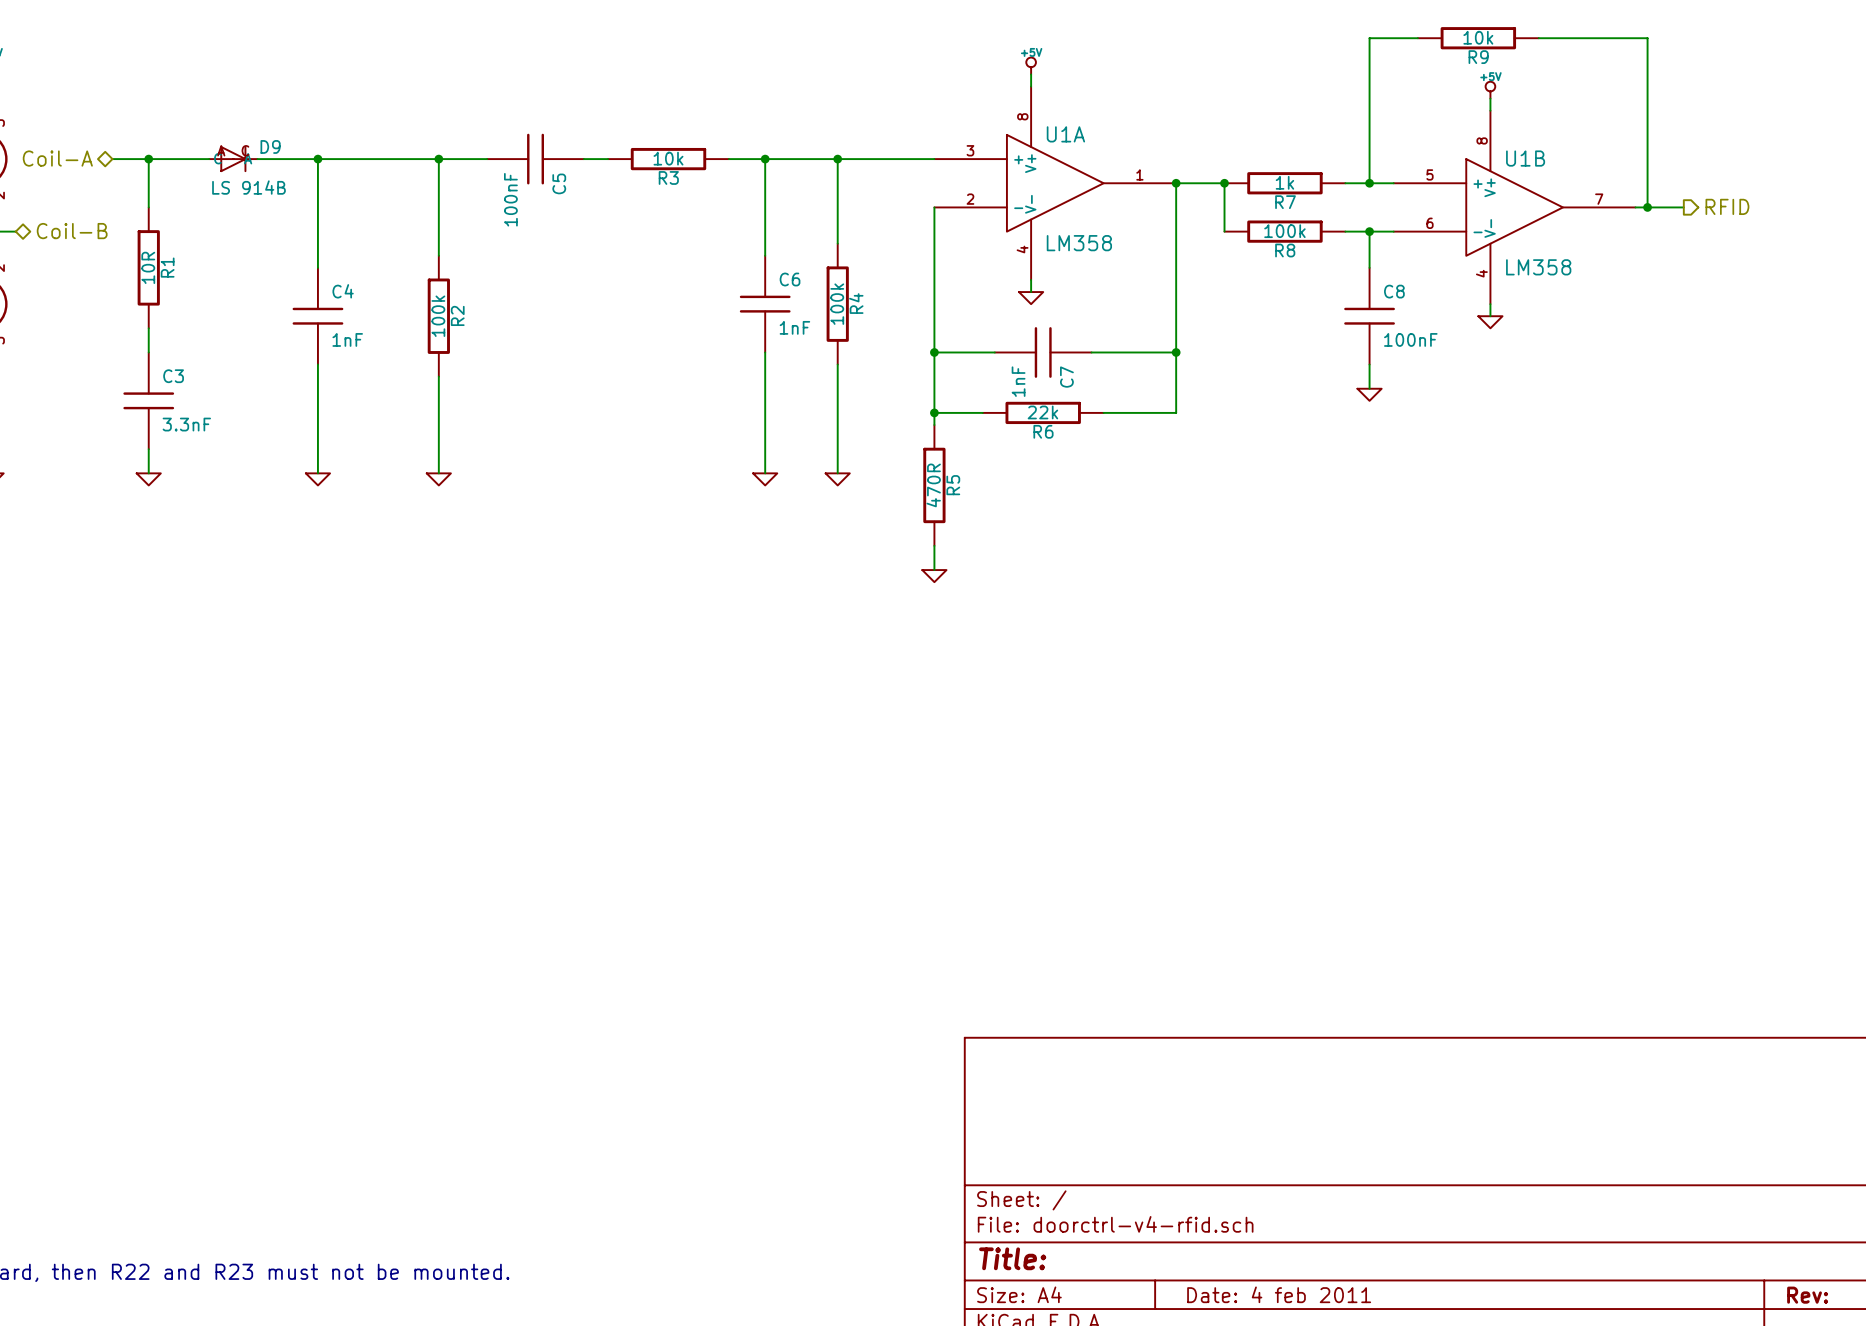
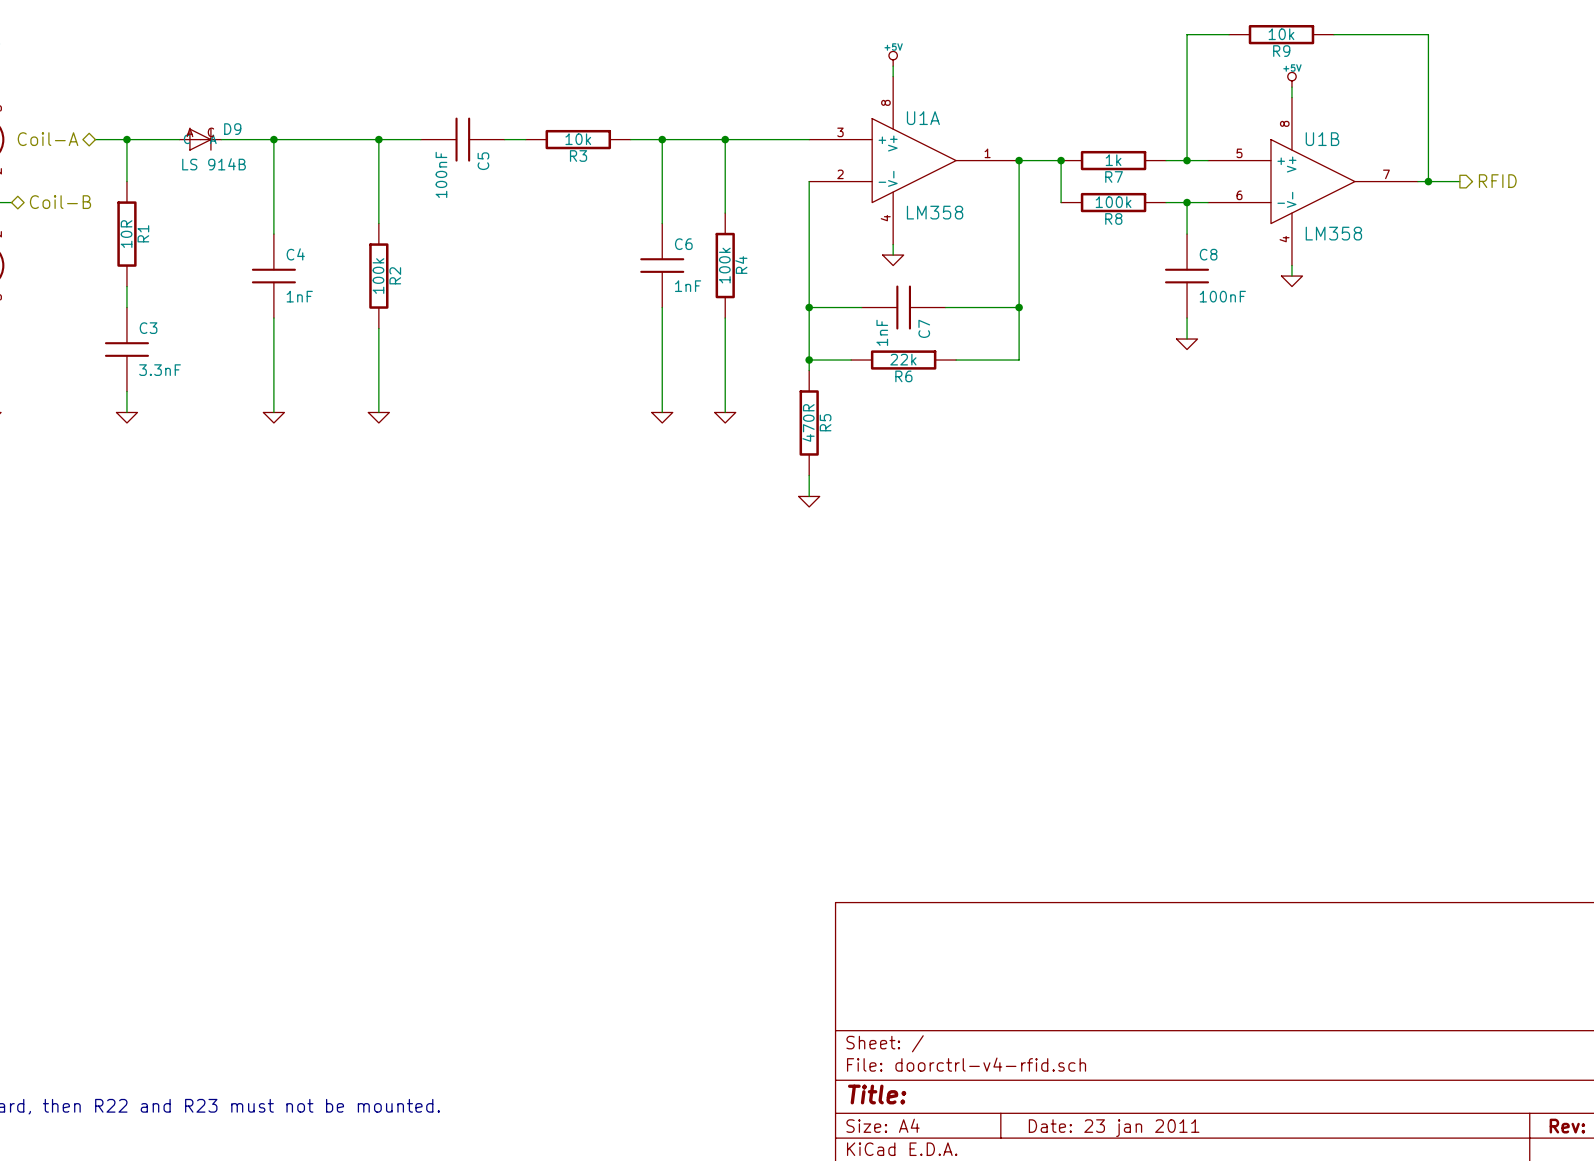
title block: Date: 4 feb 2011 (1279, 1294) -> Date: 23 jan 2011 (1114, 1128)

